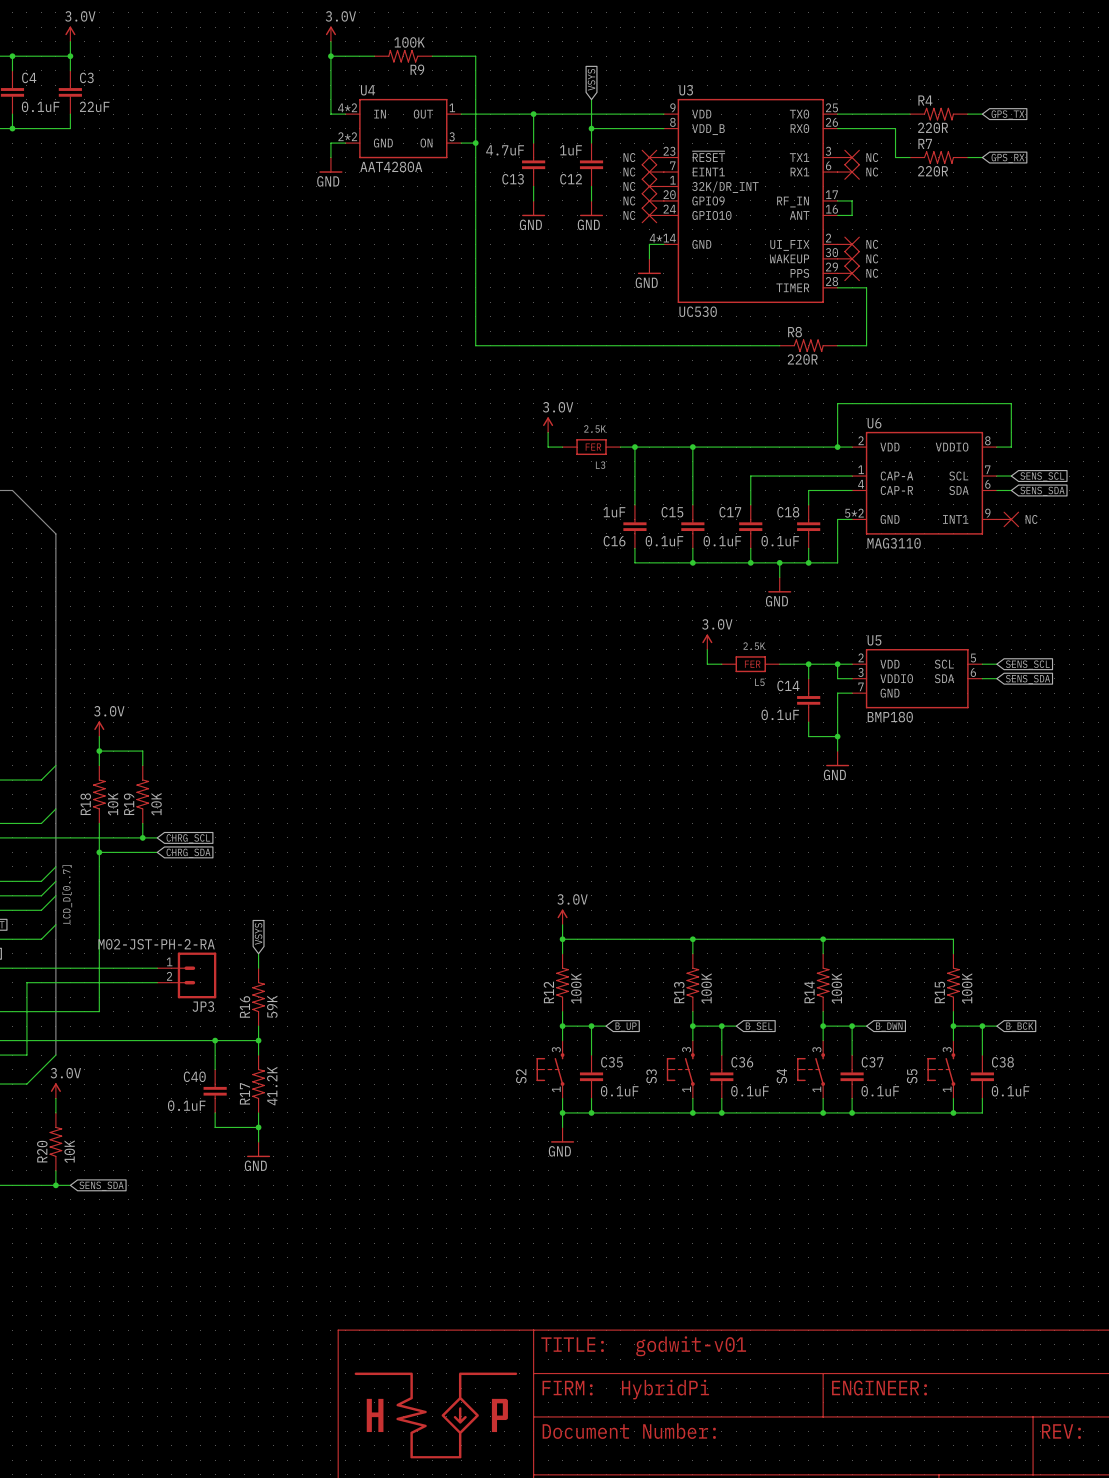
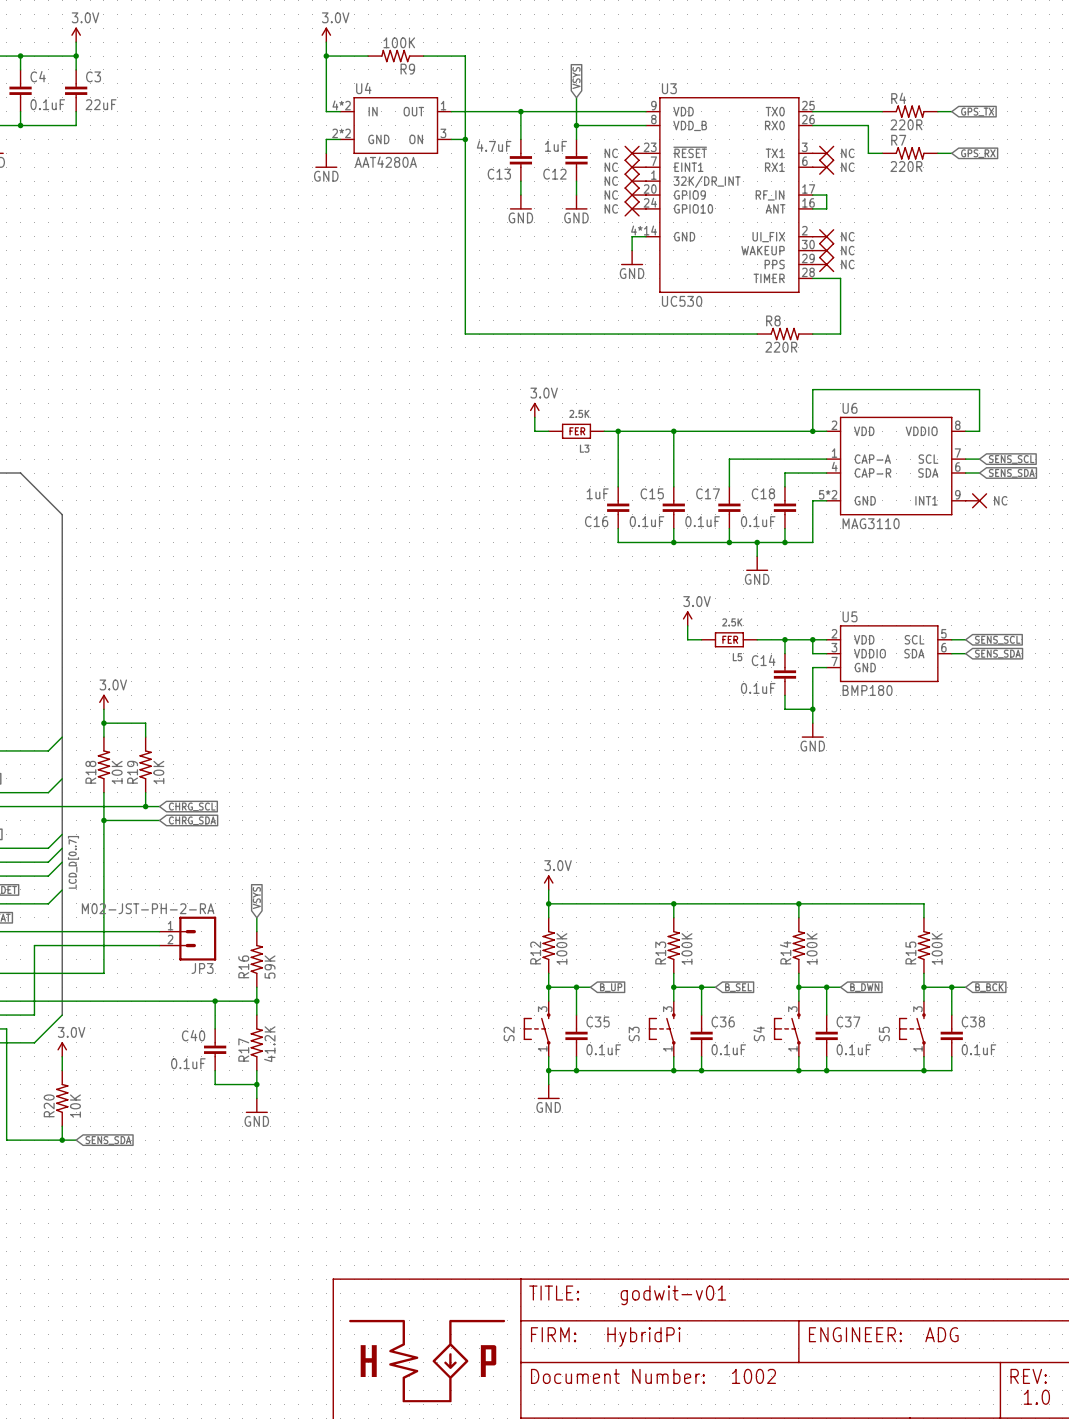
text: none -> ADG (941, 1334)
text: none -> 1002 (753, 1376)
text: none -> 1.0 (1036, 1397)

